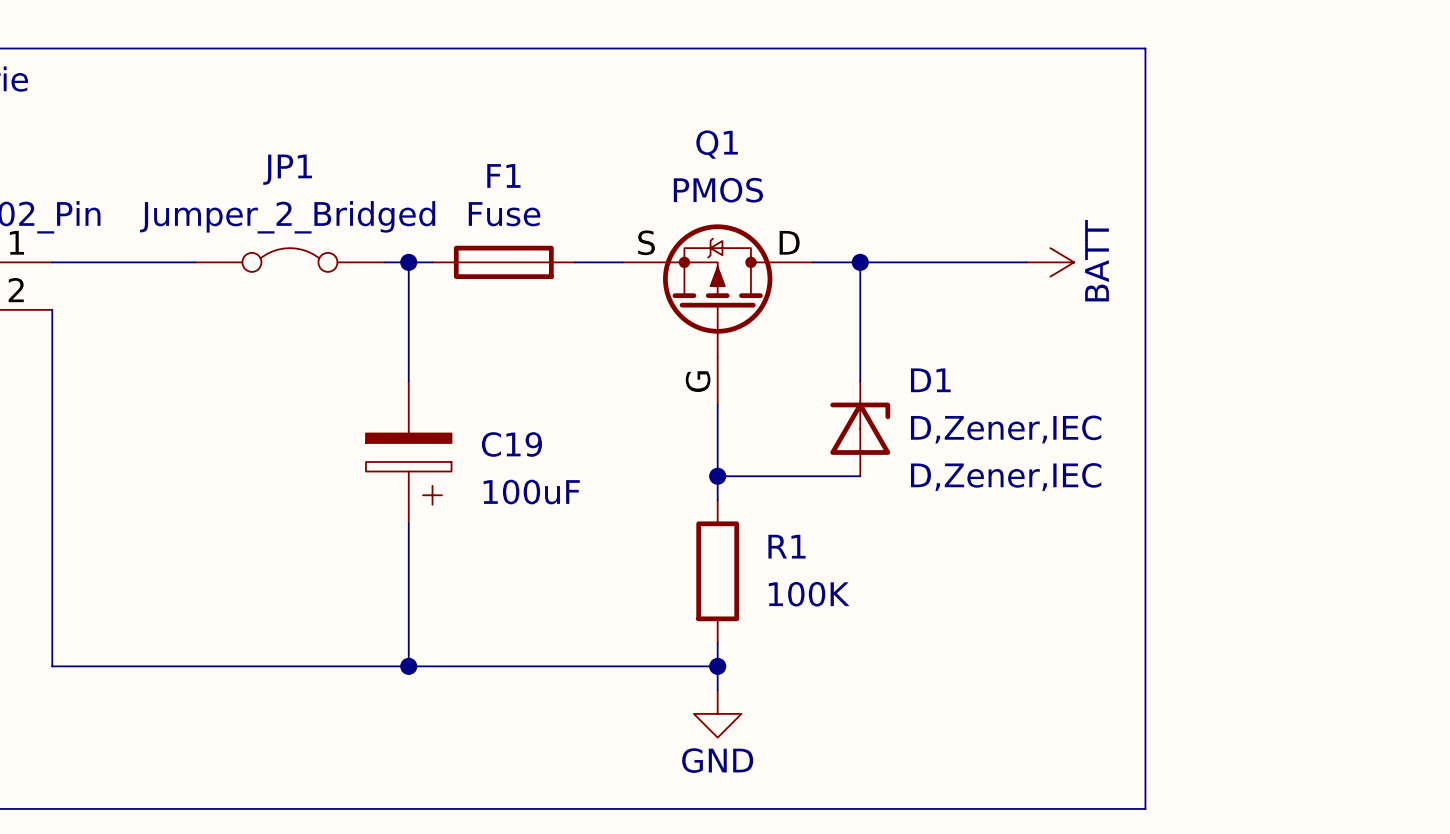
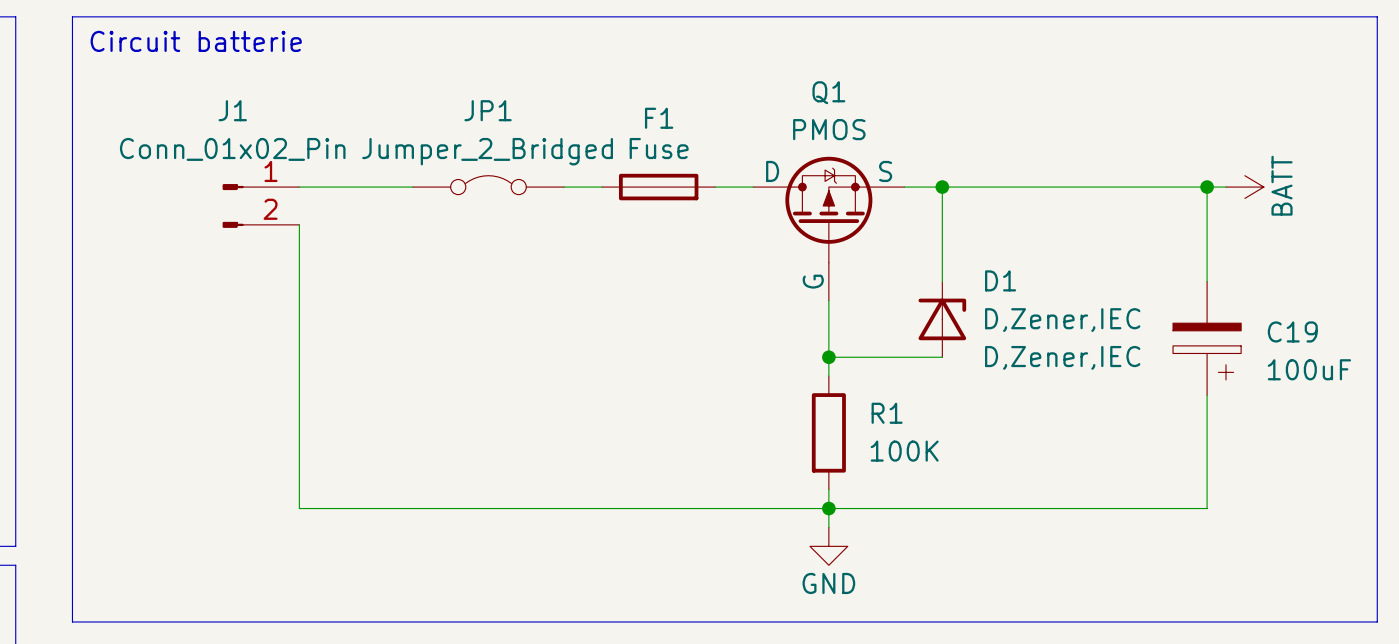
line: (1145, 48) (1145, 808) -> (1169, 16) (1377, 16) (1377, 621) (1169, 621)
wire: (408, 262) (408, 381) -> none
junction: (408, 262) -> none
wire: none -> (1074, 187) (1225, 187)
power symbol position: BATT (1050, 262) -> BATT (1244, 187)
wire: none -> (1207, 187) (1207, 281)
junction: none -> (1207, 187)
Q1 flip: as is (717, 290) -> left-right (828, 209)
C19 position: (408, 452) -> (1207, 338)
wire: (408, 523) (408, 666) -> none
wire: none -> (1207, 395) (1207, 508) (828, 508)
junction: (408, 666) -> none

